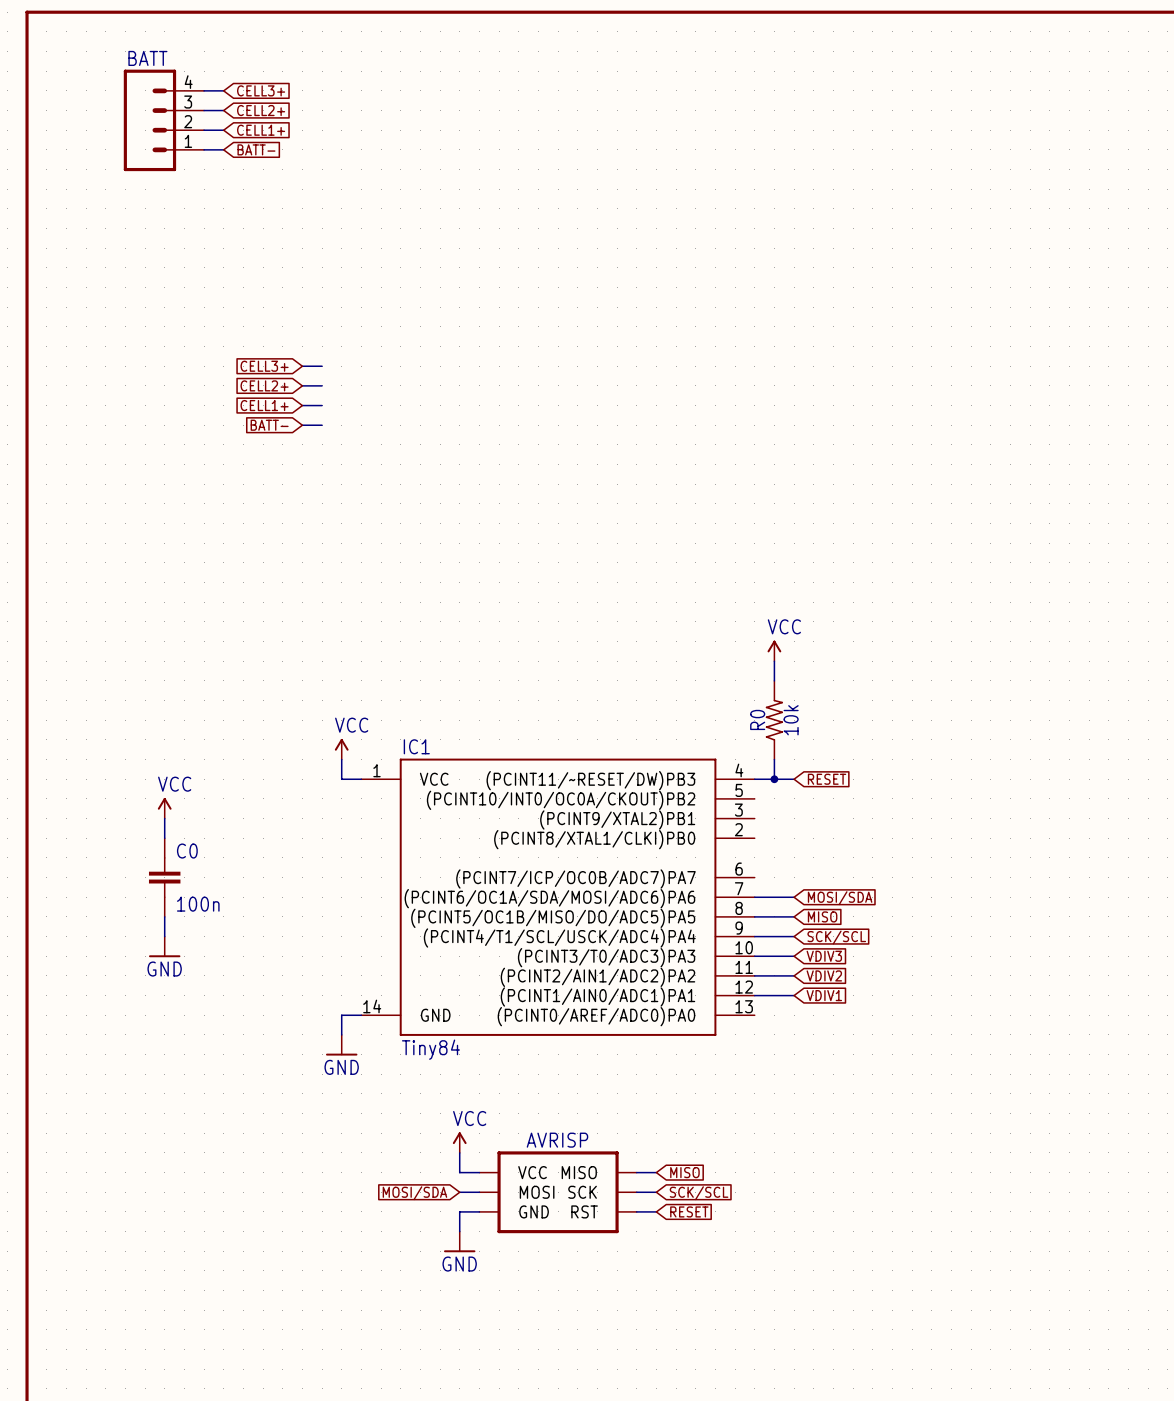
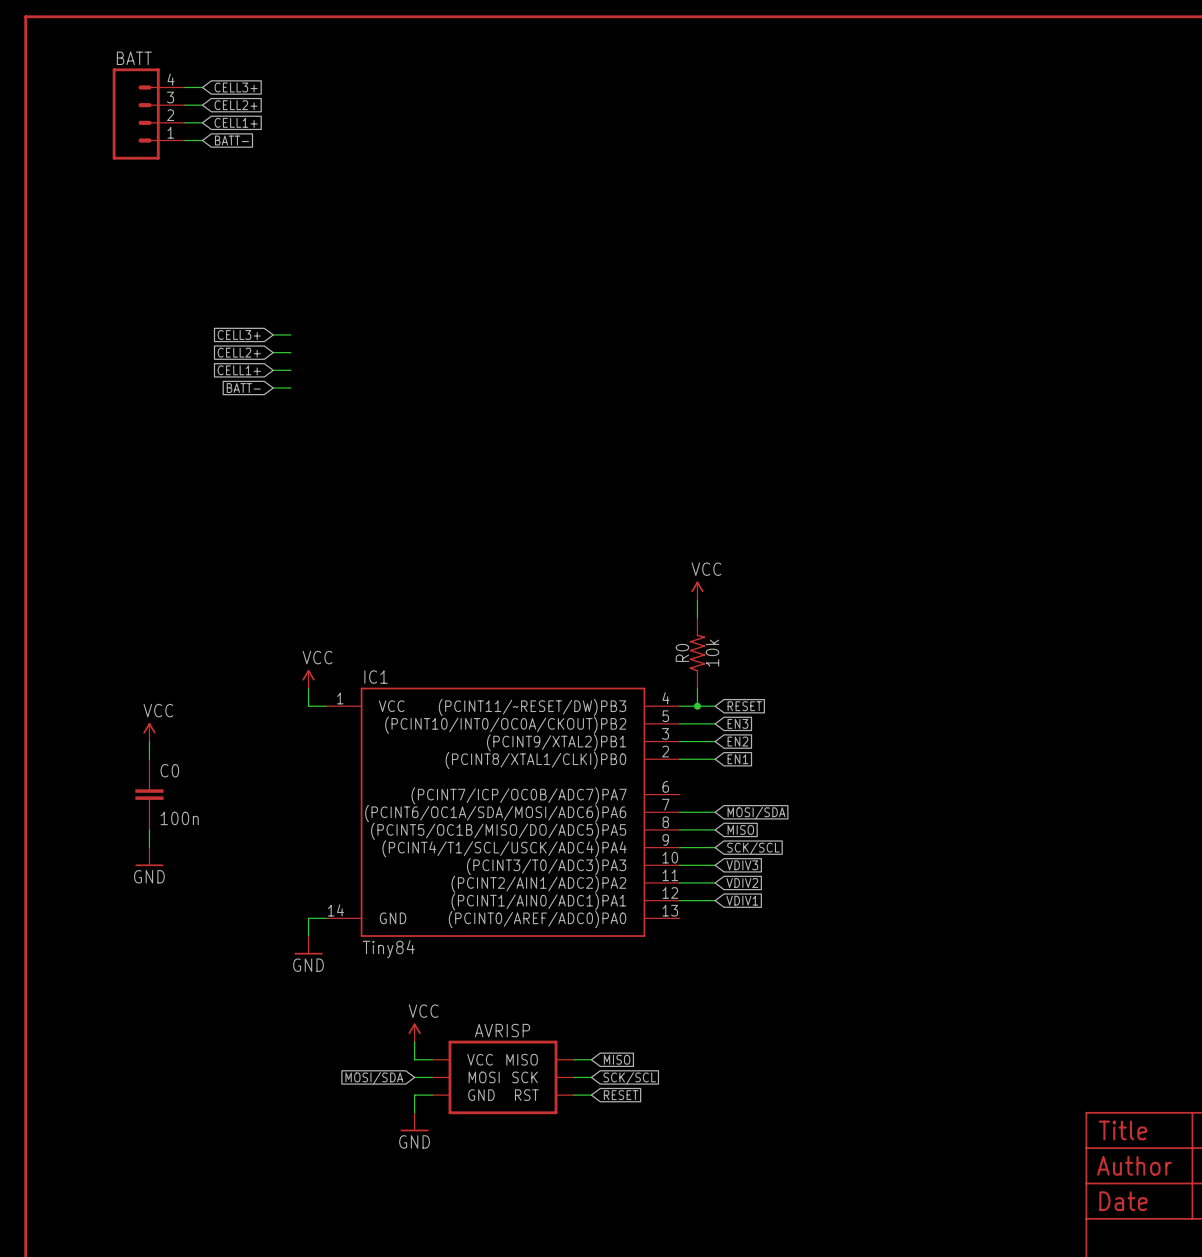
wire: none -> (679, 723) (715, 723)
global label: none -> EN3 (737, 723)
wire: none -> (679, 741) (715, 741)
global label: none -> EN2 (737, 741)
wire: none -> (679, 759) (715, 759)
global label: none -> EN1 (737, 759)

